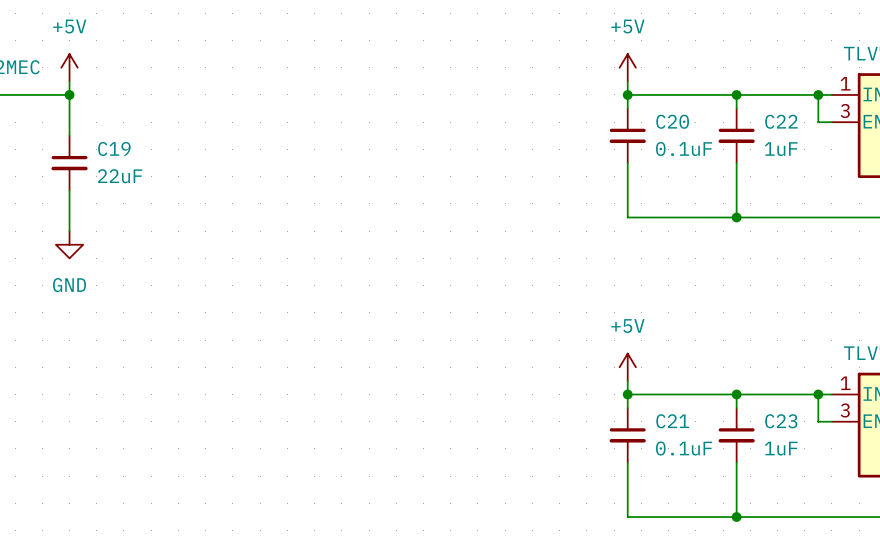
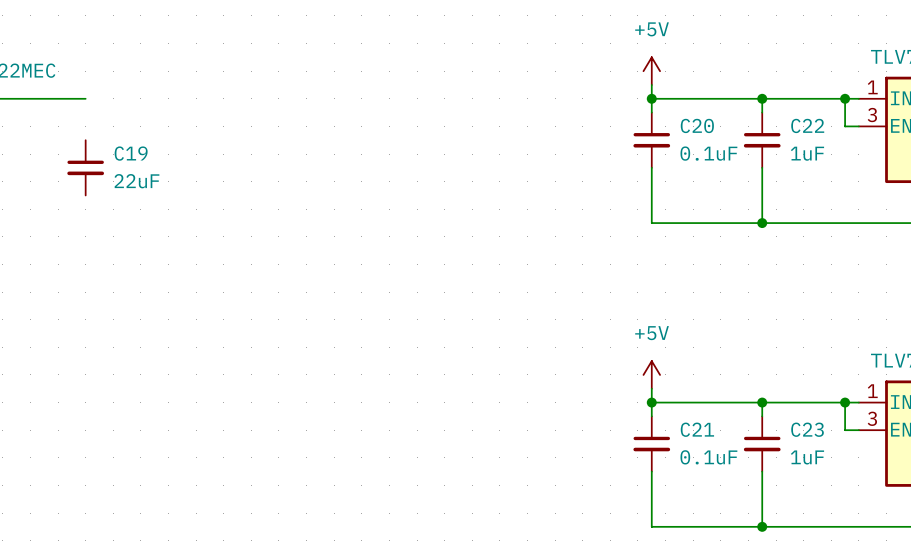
power symbol: +5V (69, 67) -> none
wire: (69, 81) (69, 135) -> none
junction: (69, 94) -> none
wire: (69, 190) (69, 231) -> none
power symbol: GND (69, 244) -> none

